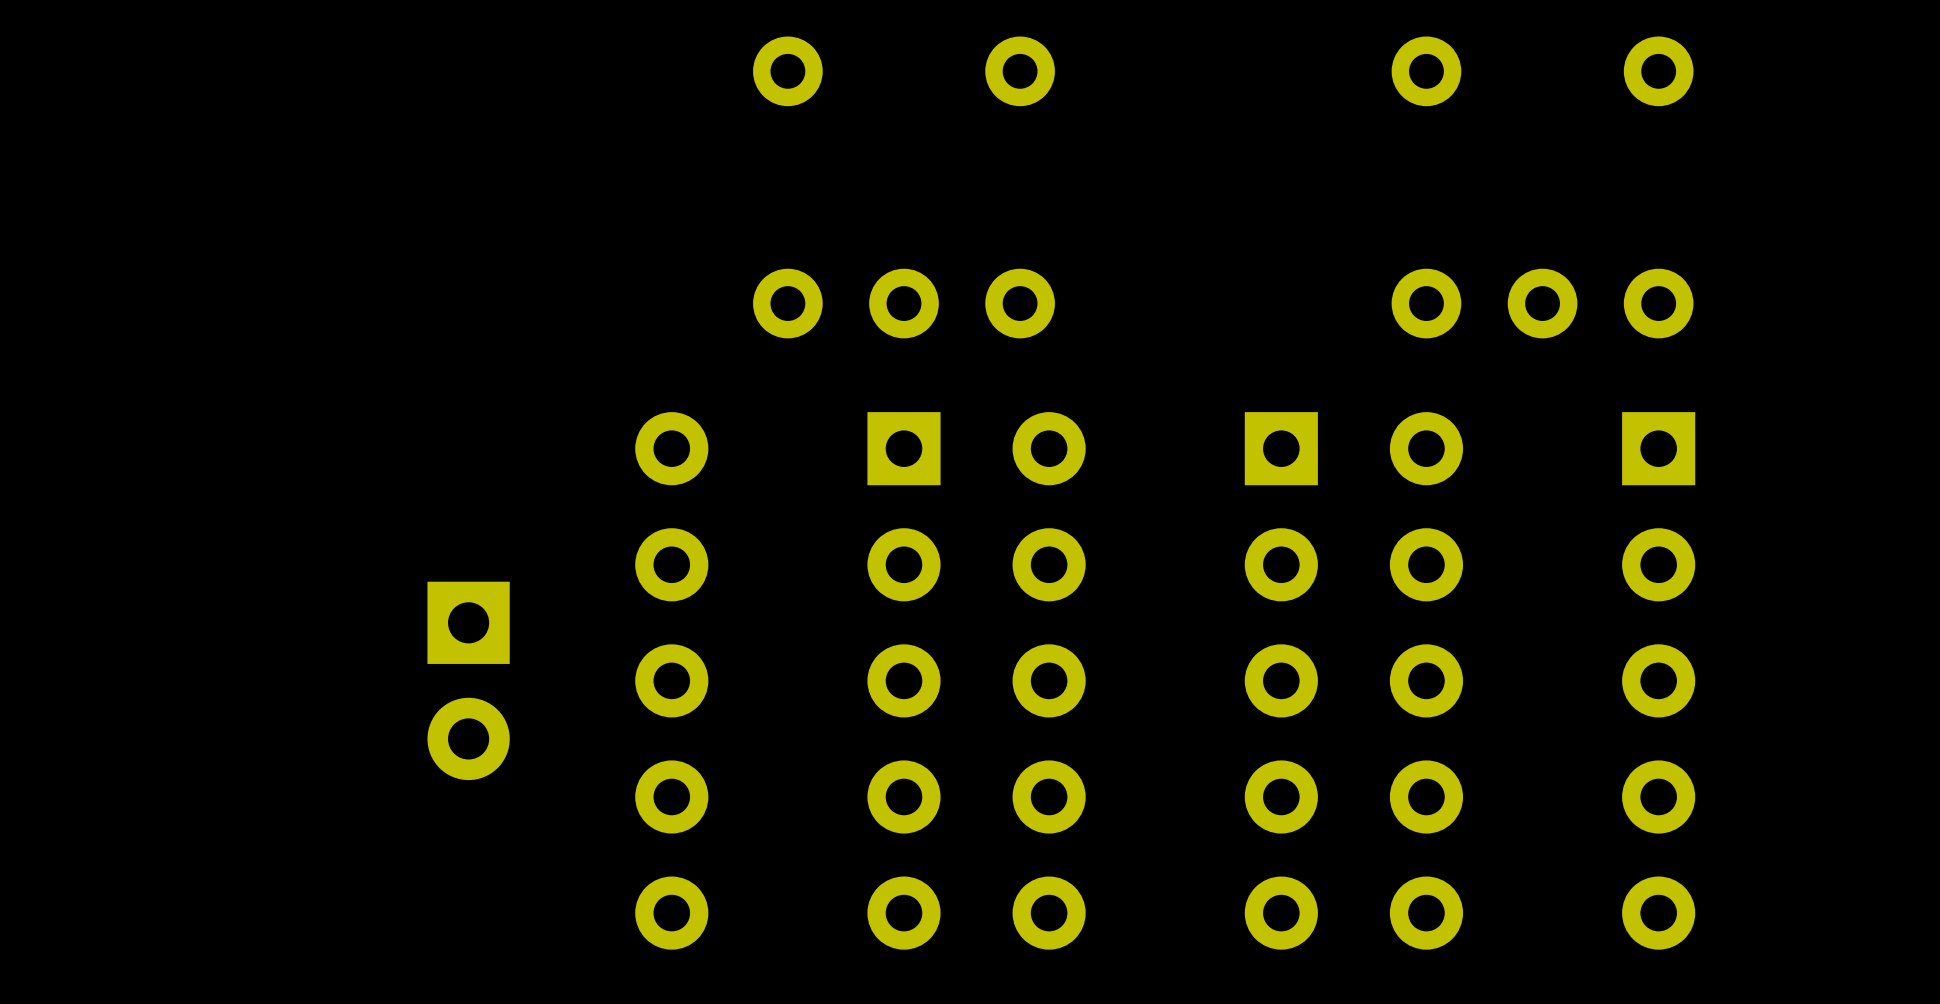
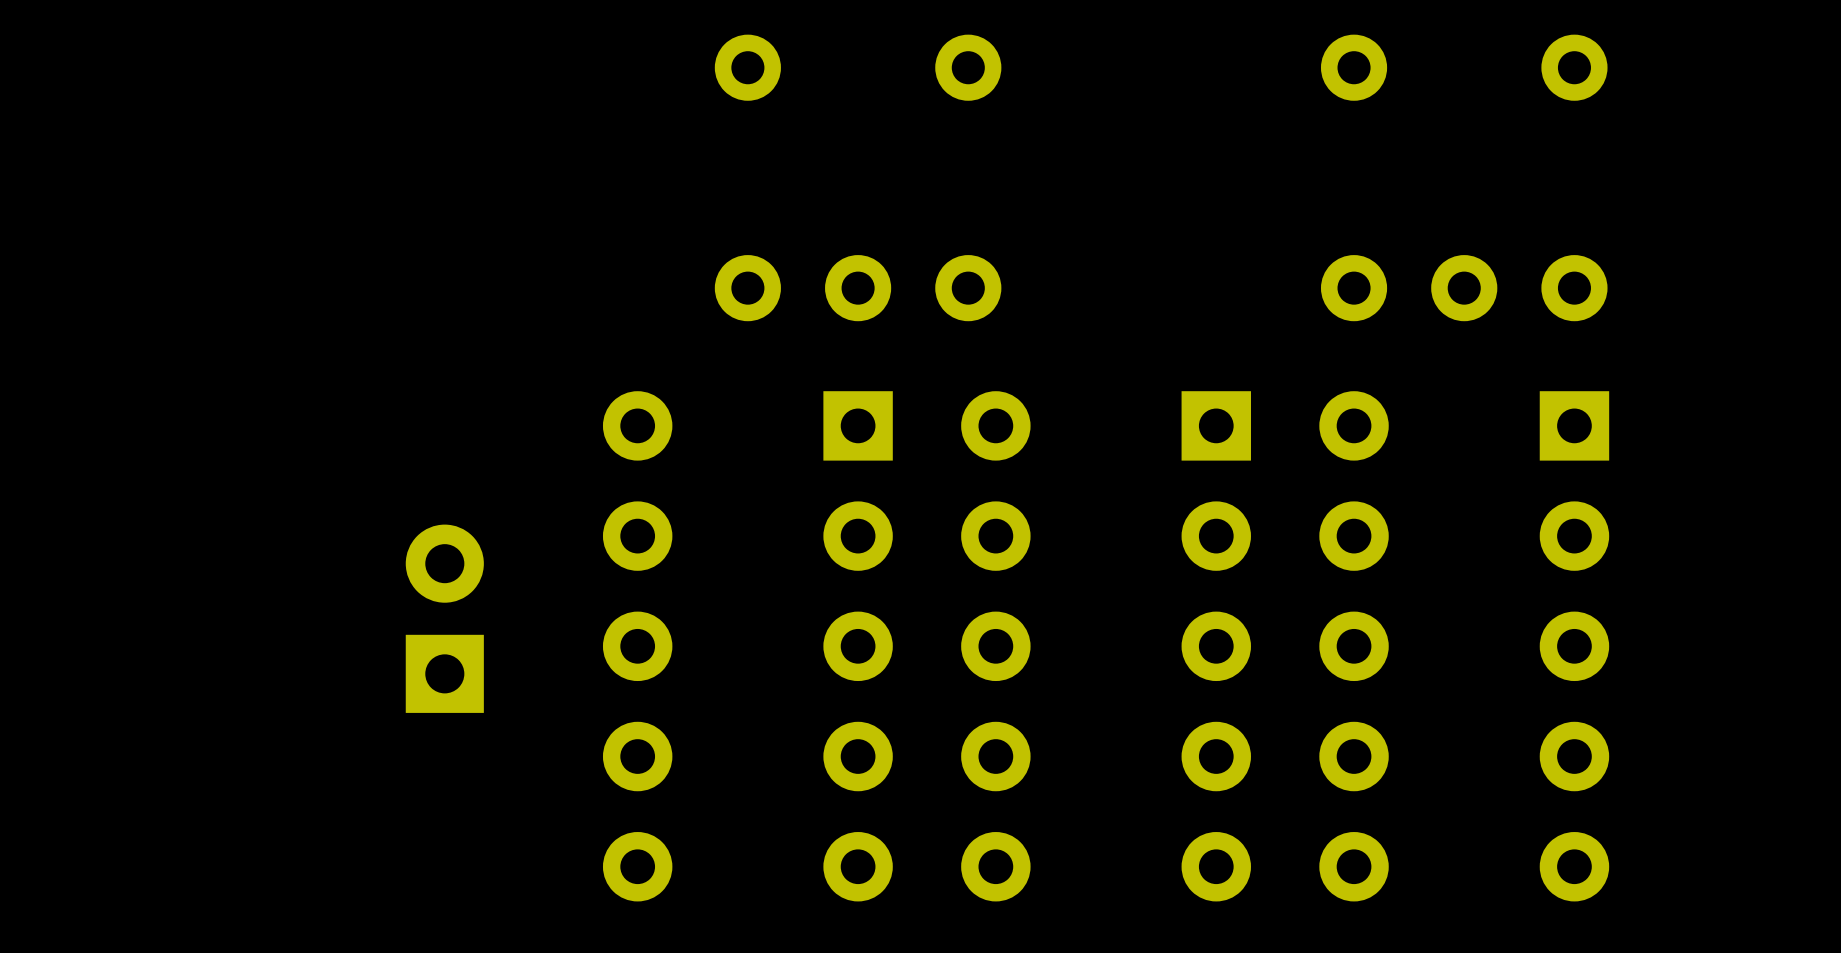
part rotation: 0° (468, 680) -> 180° (444, 618)

